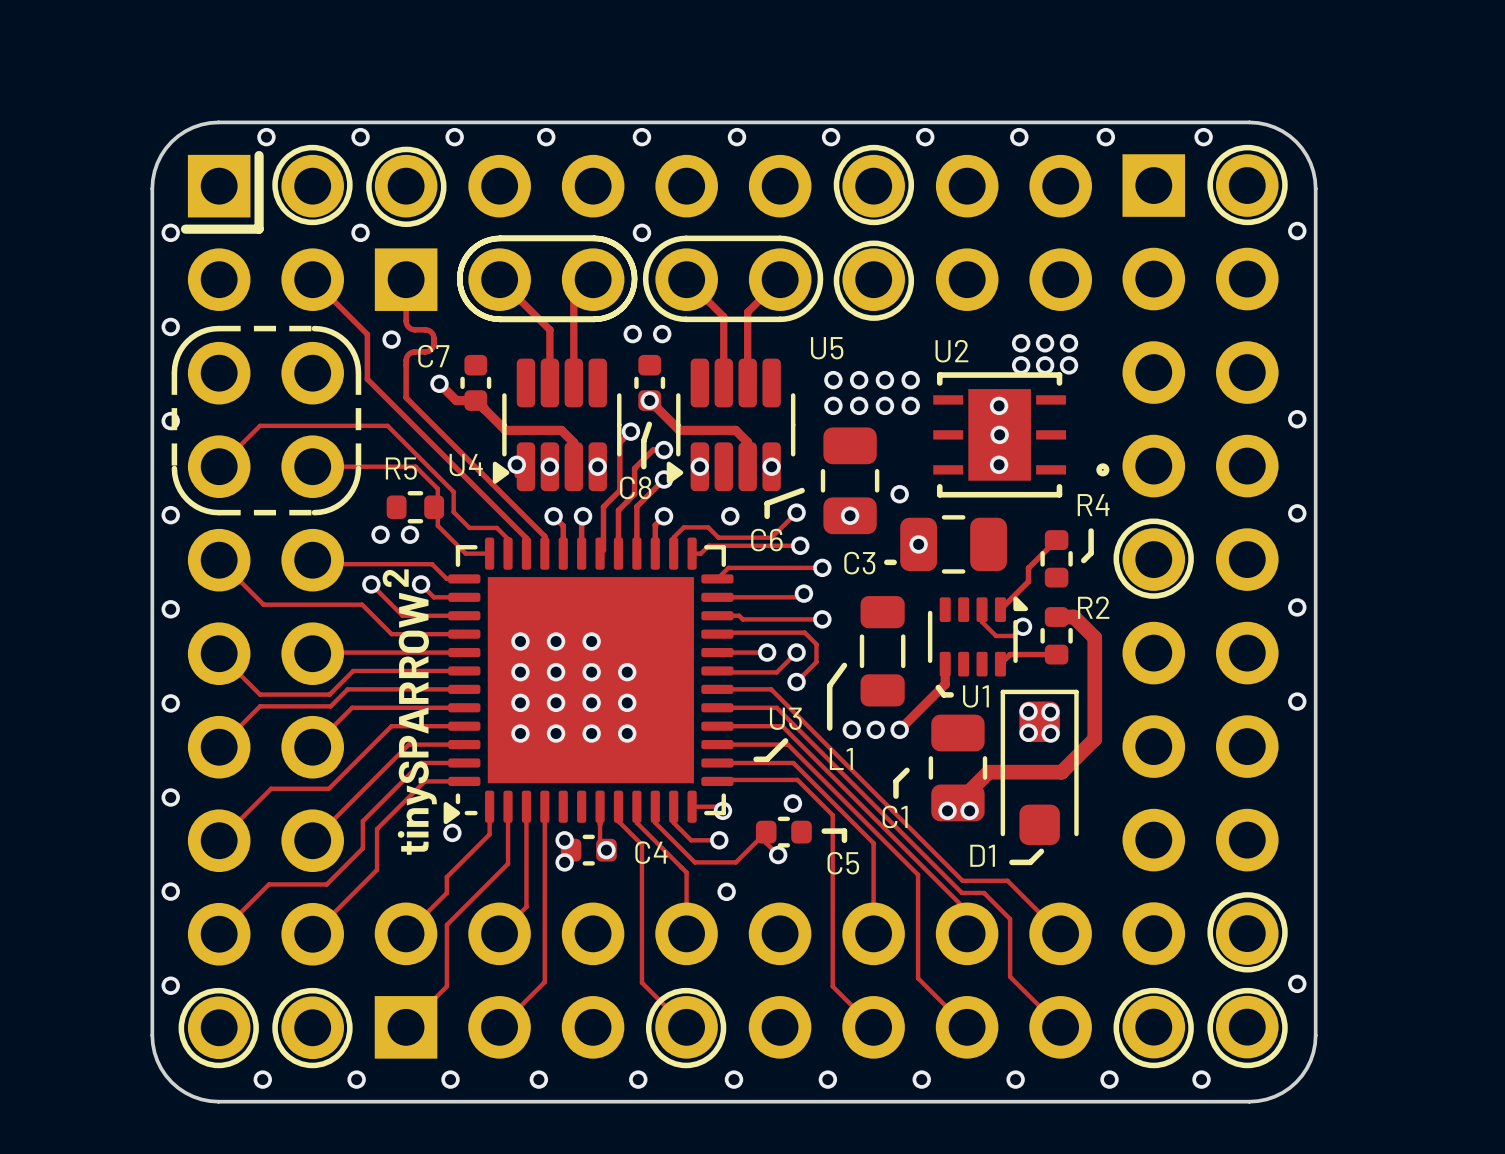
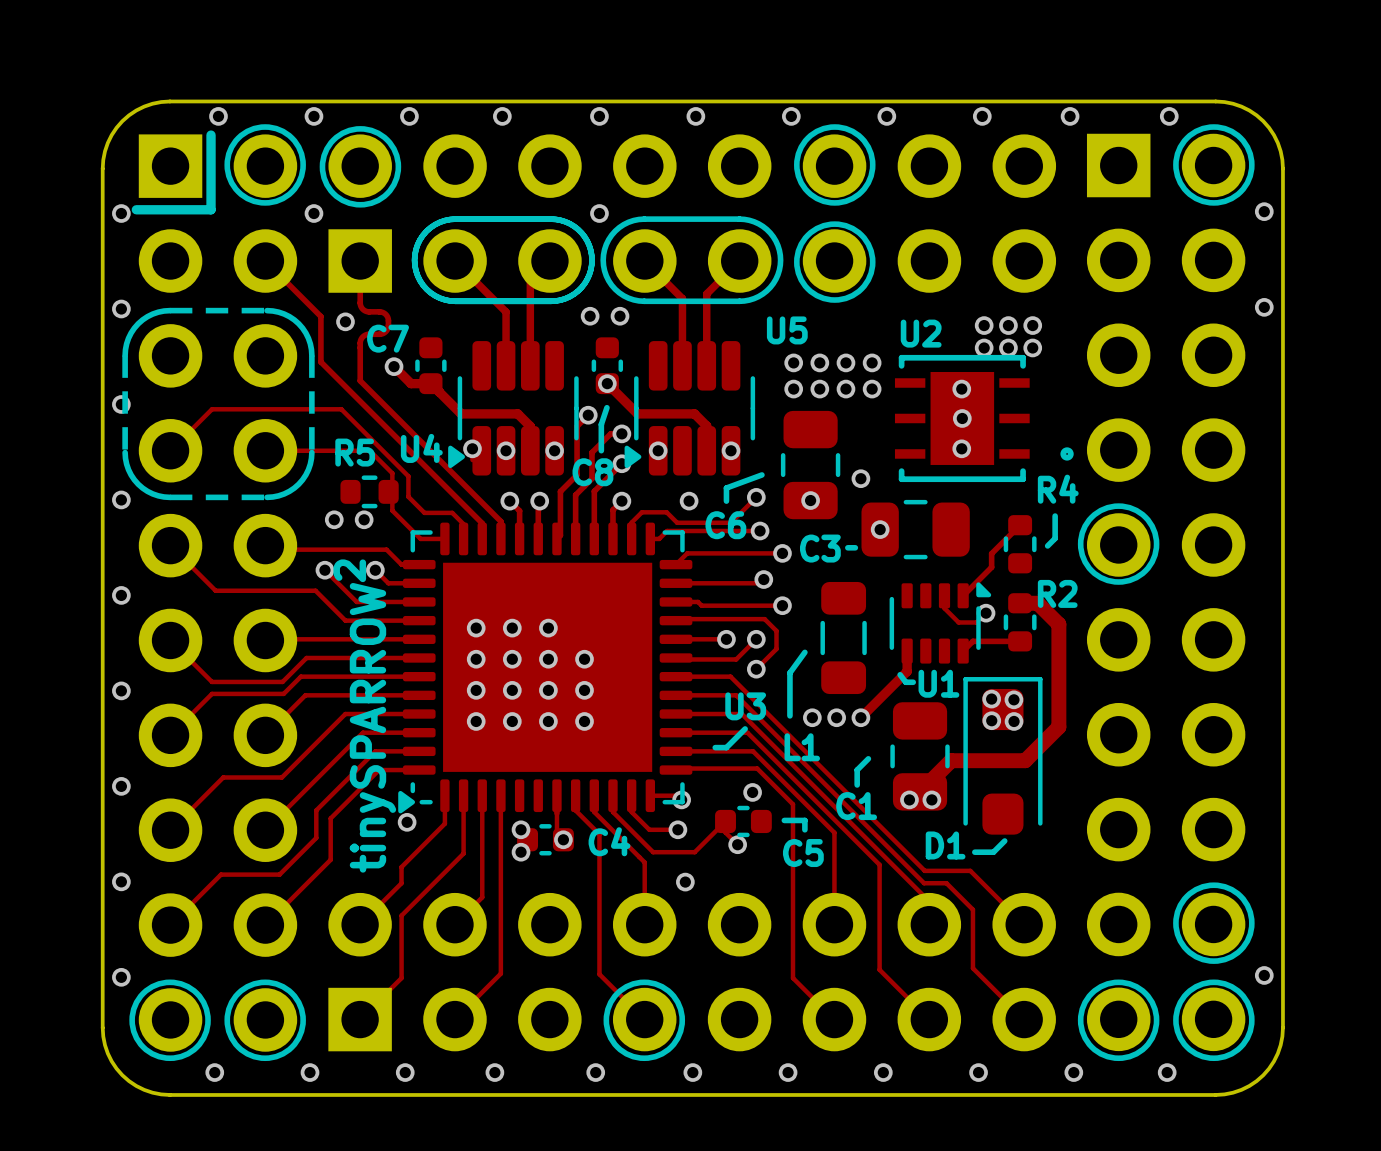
via: none -> (1264, 307)
via: (1297, 419) -> none
via: (1297, 513) -> none
via: (1297, 607) -> none
via: (1297, 701) -> none

